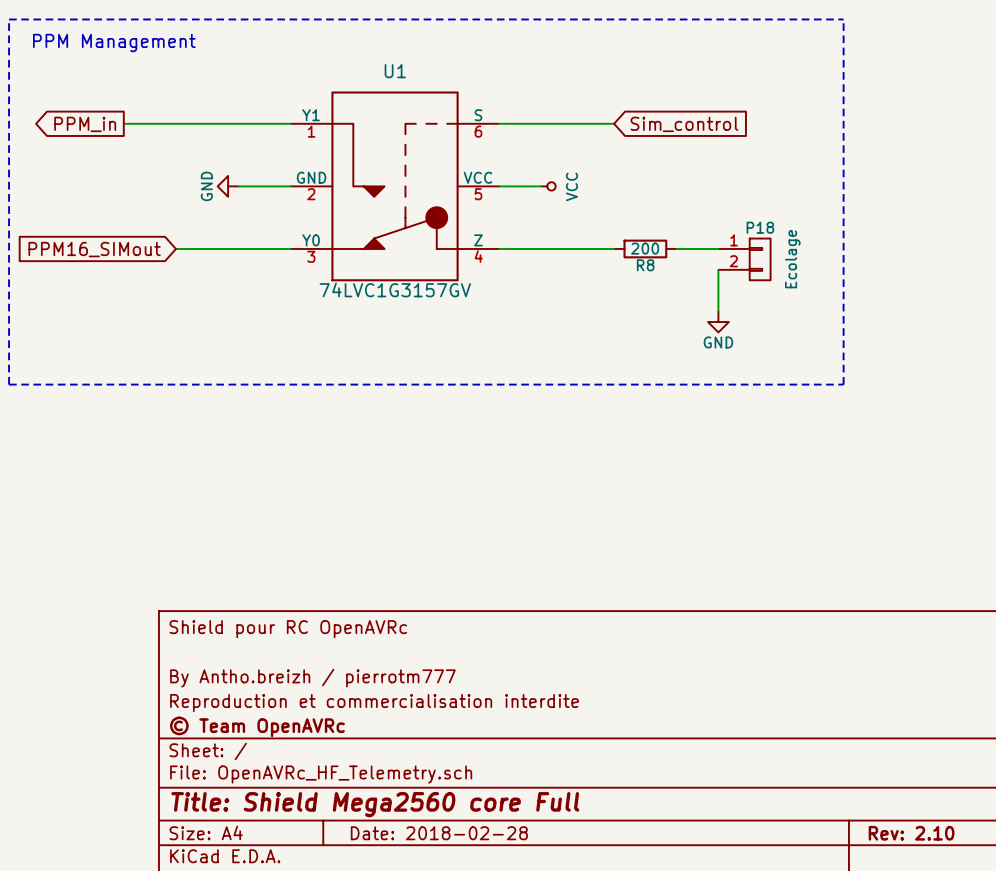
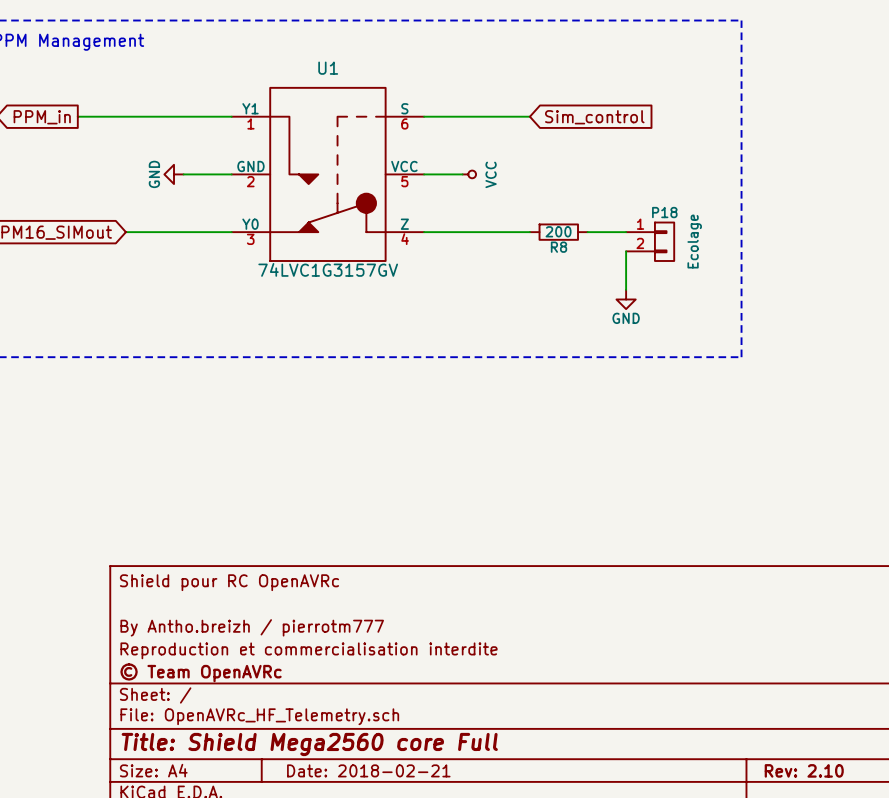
title block: Date: 2018-02-28 (439, 833) -> Date: 2018-02-21 (368, 770)

